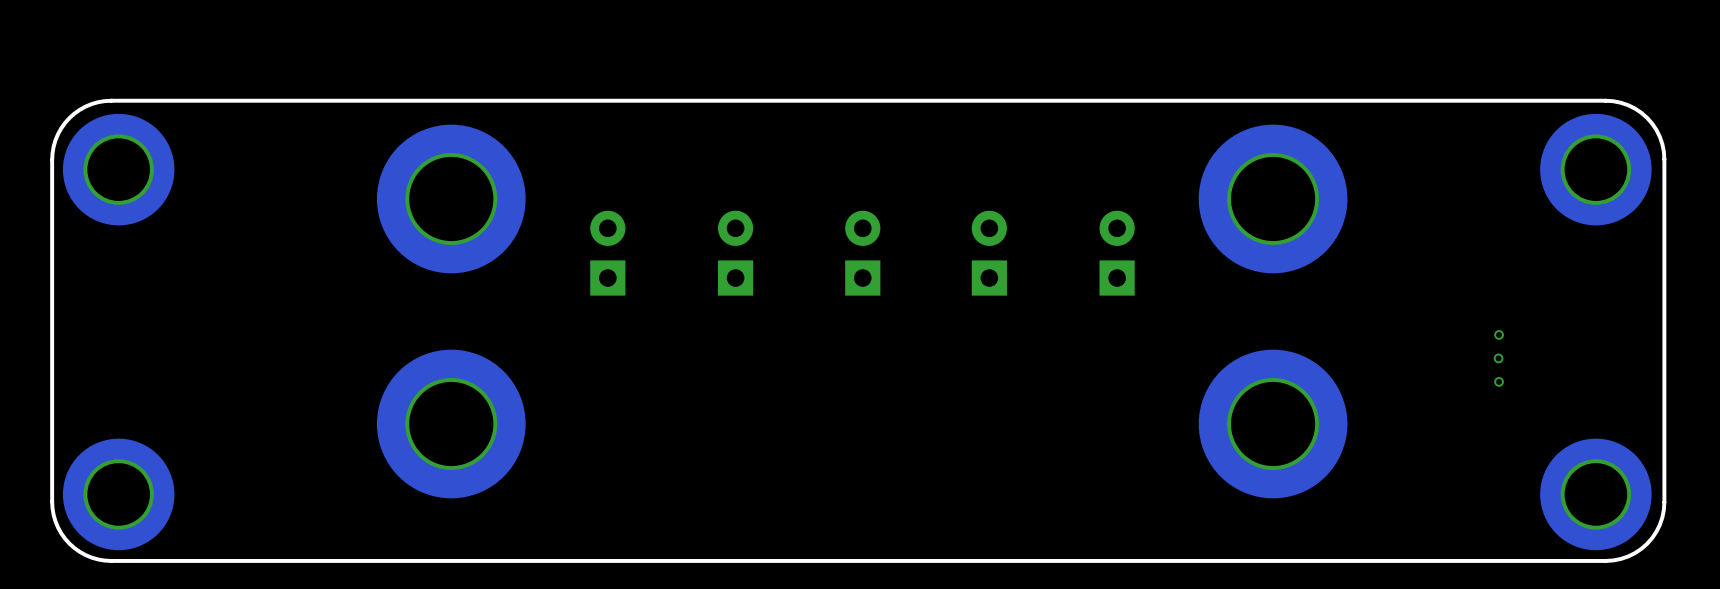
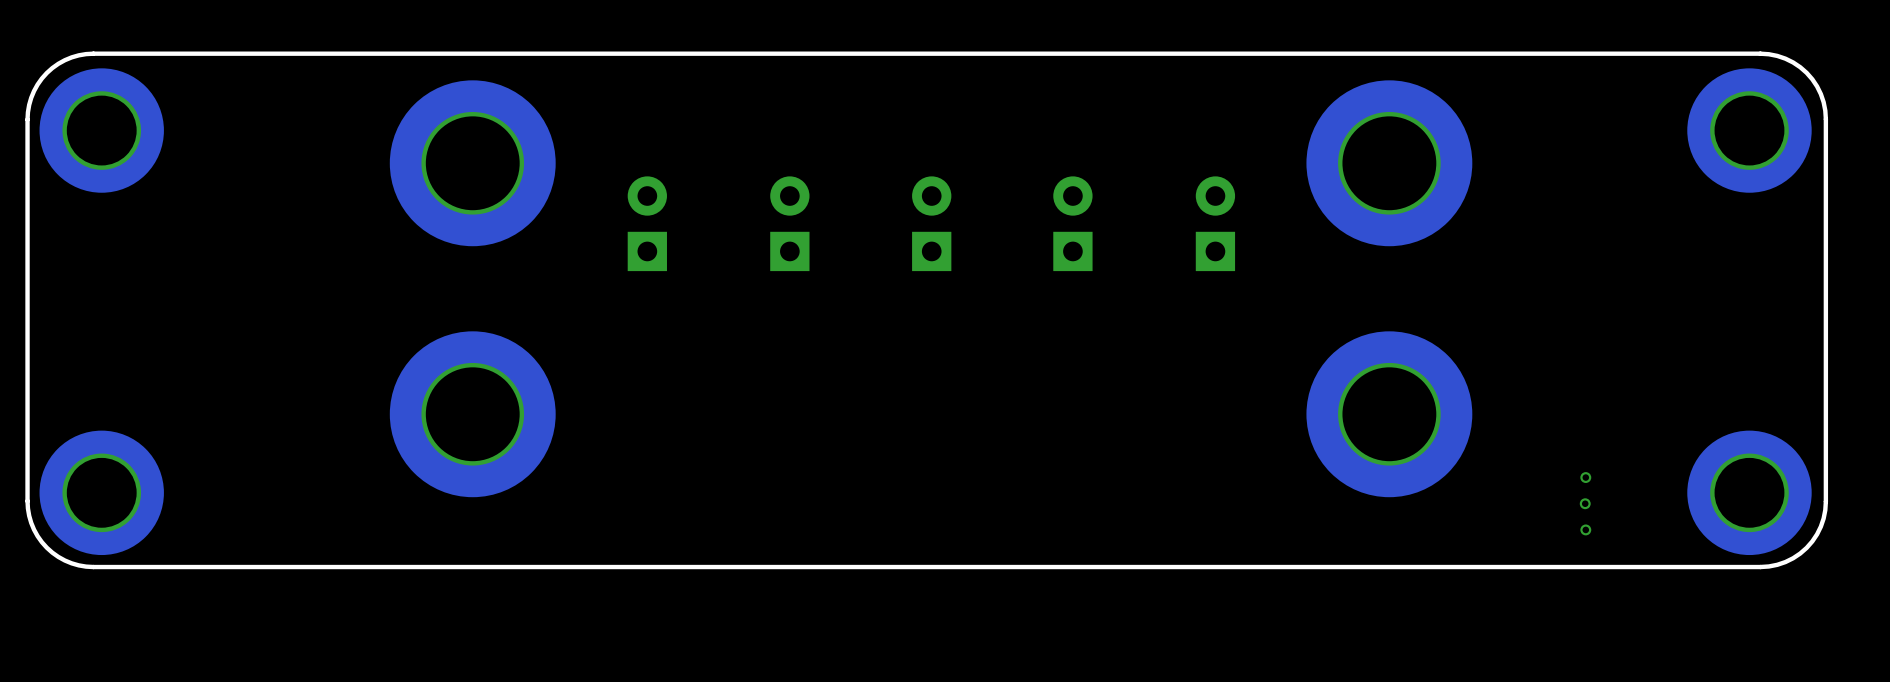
part position: (1498, 358) -> (1585, 503)

